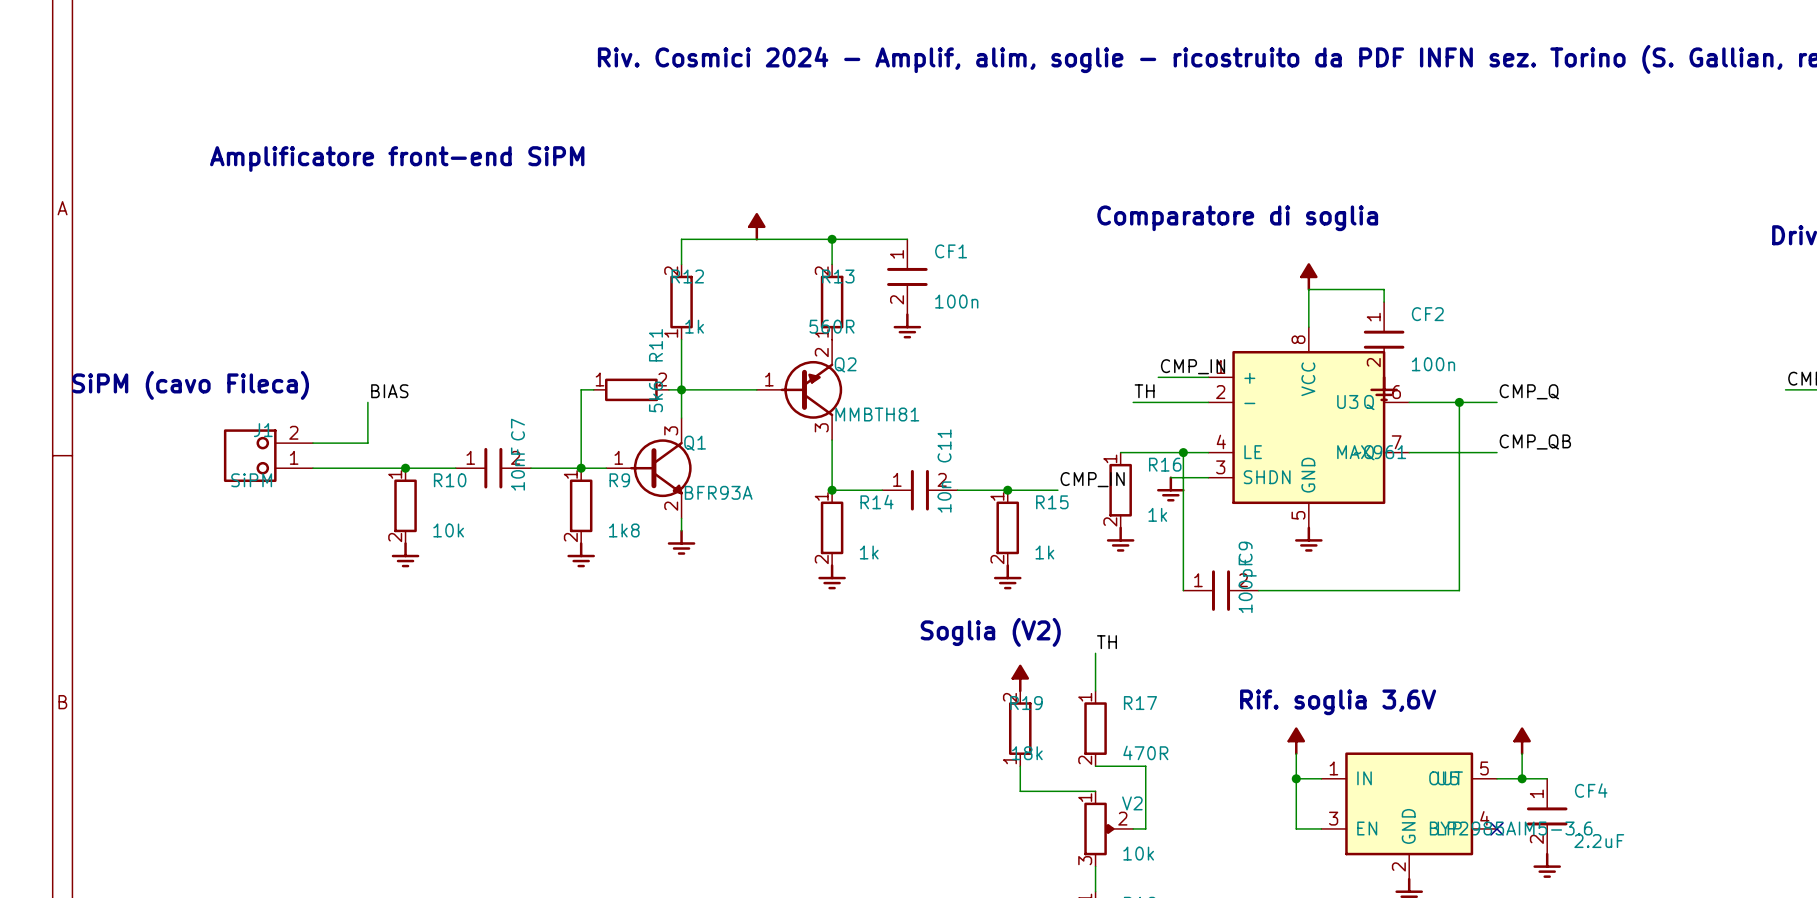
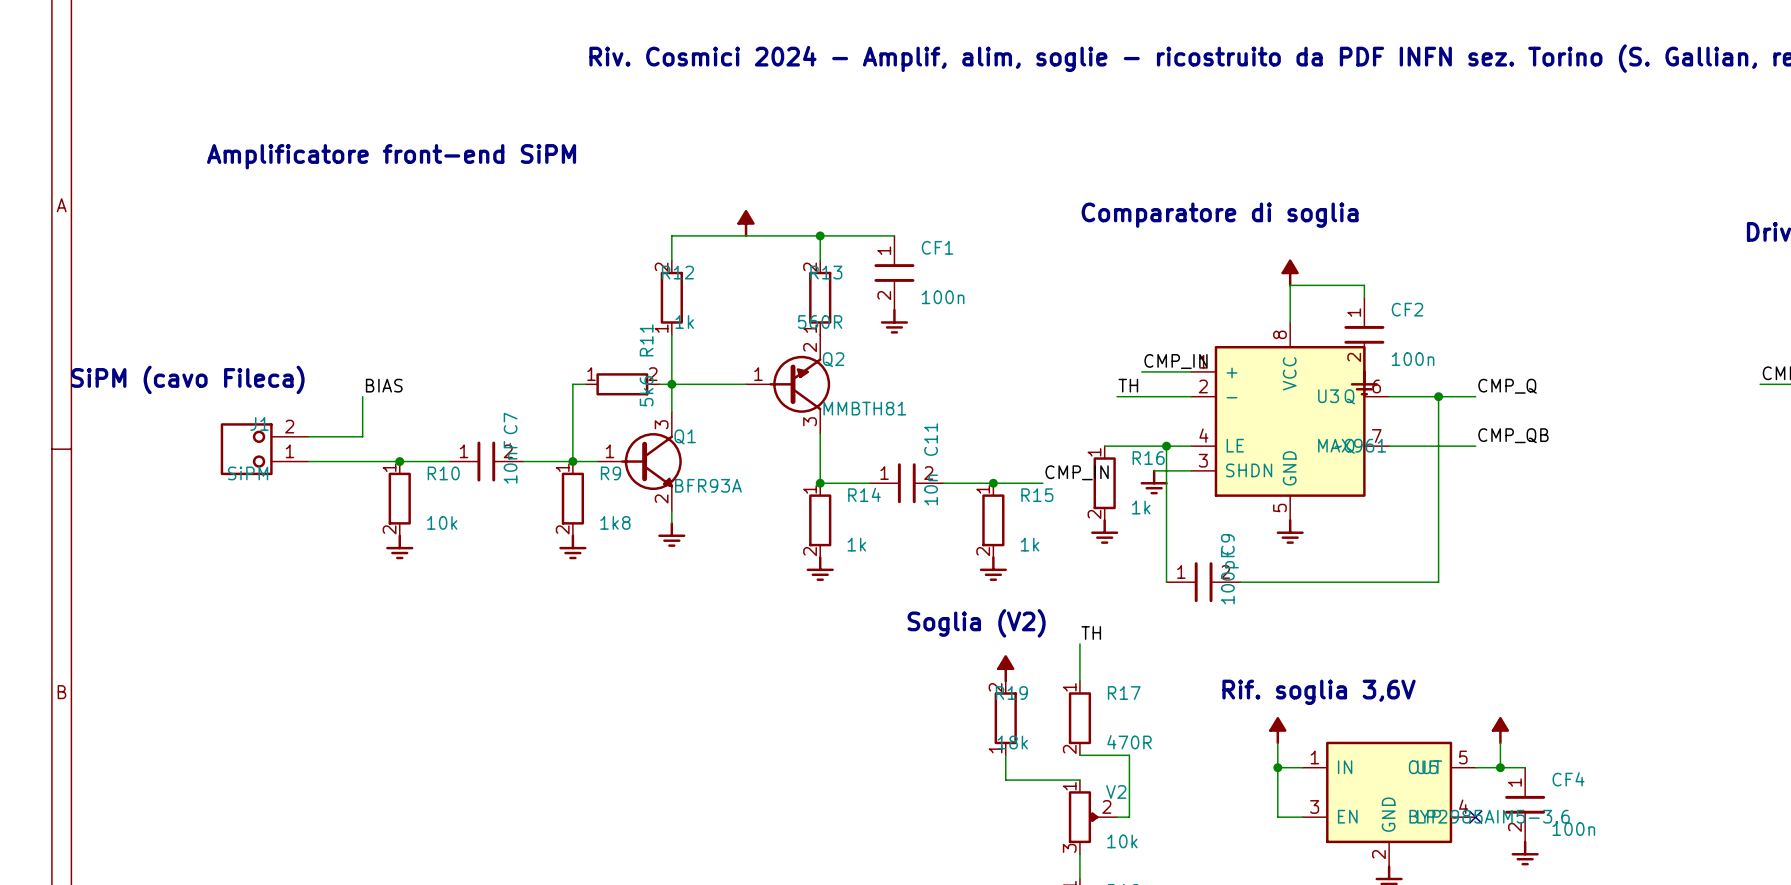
CF4 value: 2.2uF (1599, 841) -> 100n (1573, 829)

